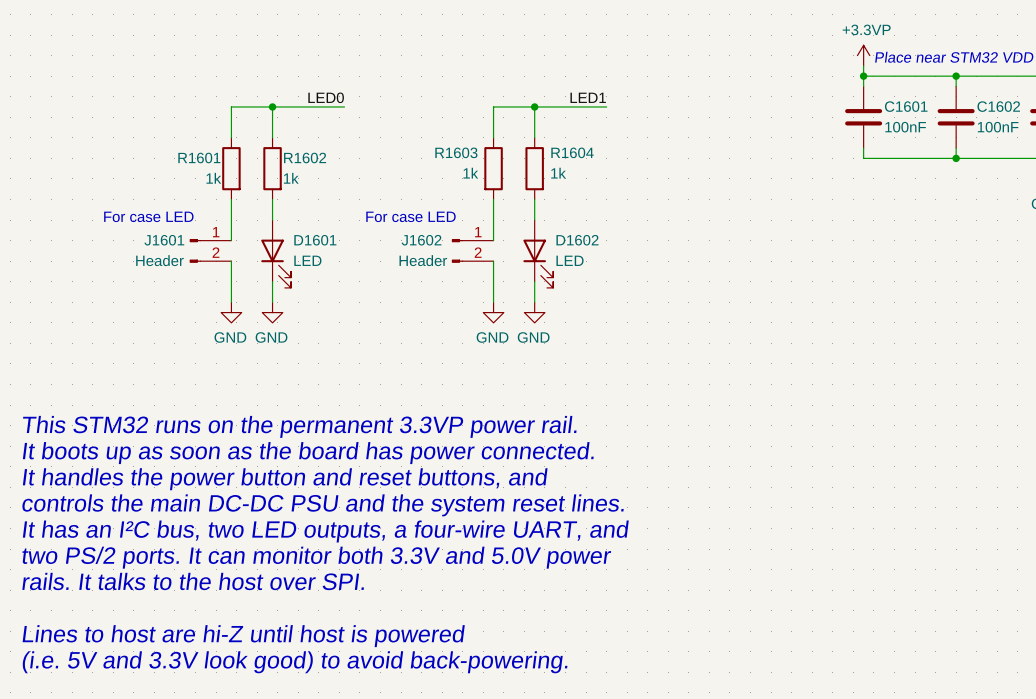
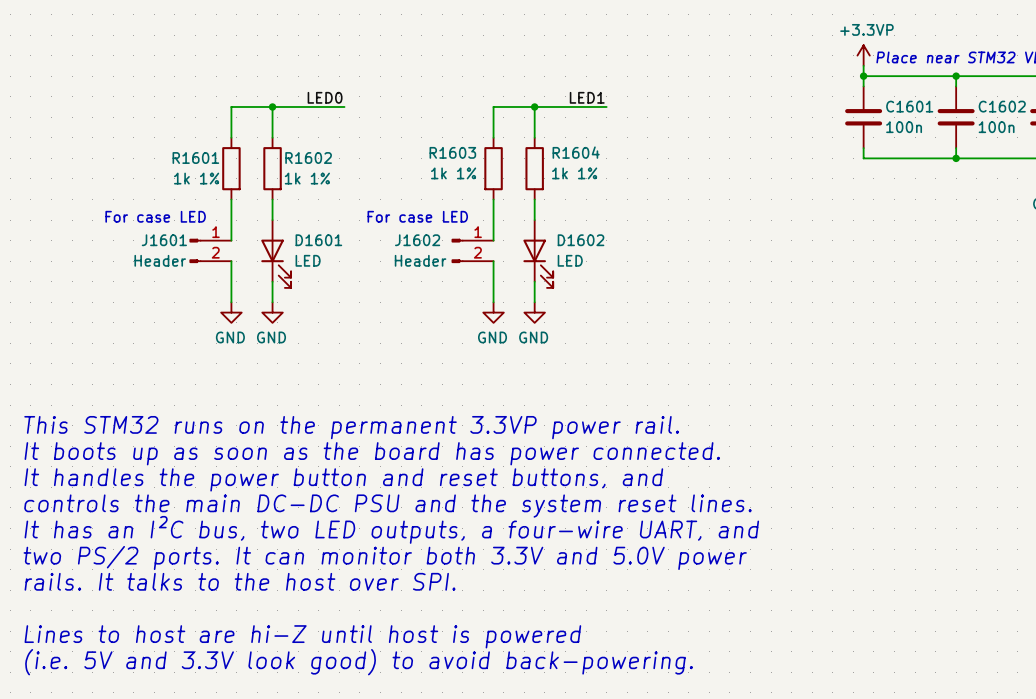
C1601 value: 100nF (905, 127) -> 100n (904, 127)
C1602 value: 100nF (998, 127) -> 100n (996, 127)
R1603 value: 1k (470, 173) -> 1k 1% (453, 173)
R1604 value: 1k (558, 173) -> 1k 1% (574, 173)
R1601 value: 1k (213, 178) -> 1k 1% (196, 178)
R1602 value: 1k (291, 178) -> 1k 1% (307, 178)

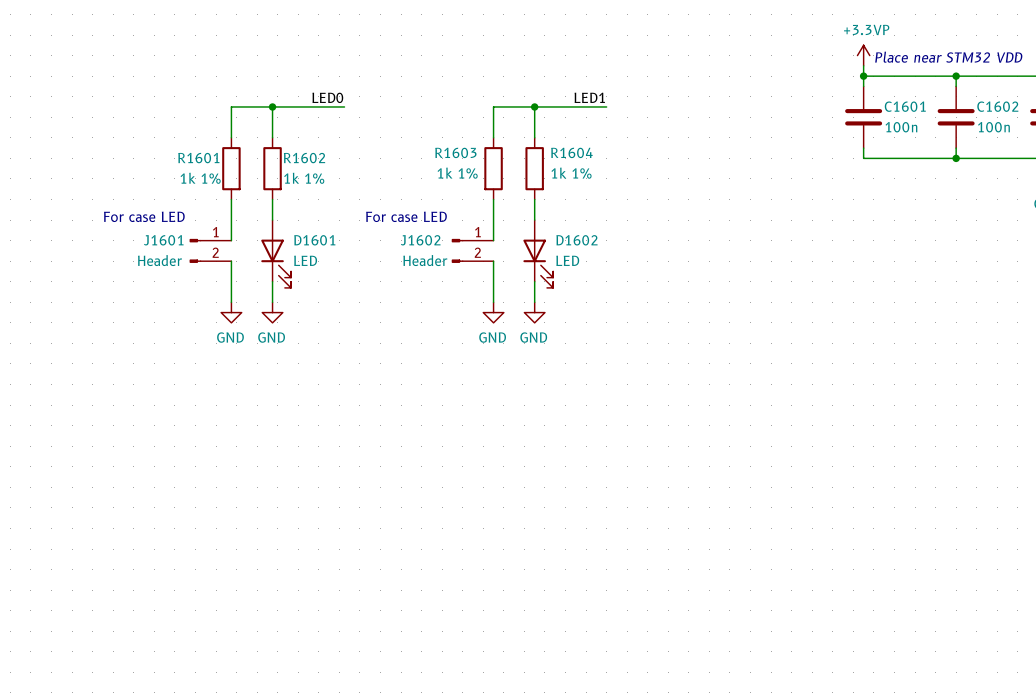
text: This STM32 runs on the permanent 3.3VP power rail. (351, 427) -> none
text: It boots up as soon as the board has power connected. (372, 453) -> none
text: It handles the power button and reset buttons, and (343, 479) -> none
text: controls the main DC-DC PSU and the system reset lines. (387, 506) -> none
text: It has an I²C bus, two LED outputs, a four-wire UART, and (391, 529) -> none
text: two PS/2 ports. It can monitor both 3.3V and 5.0V power (385, 557) -> none
text: rails. It talks to the host over SPI. (240, 581) -> none
text: Lines to host are hi-Z until host is powered (302, 636) -> none
text: (i.e. 5V and 3.3V look good) to avoid back-powering. (359, 662) -> none

